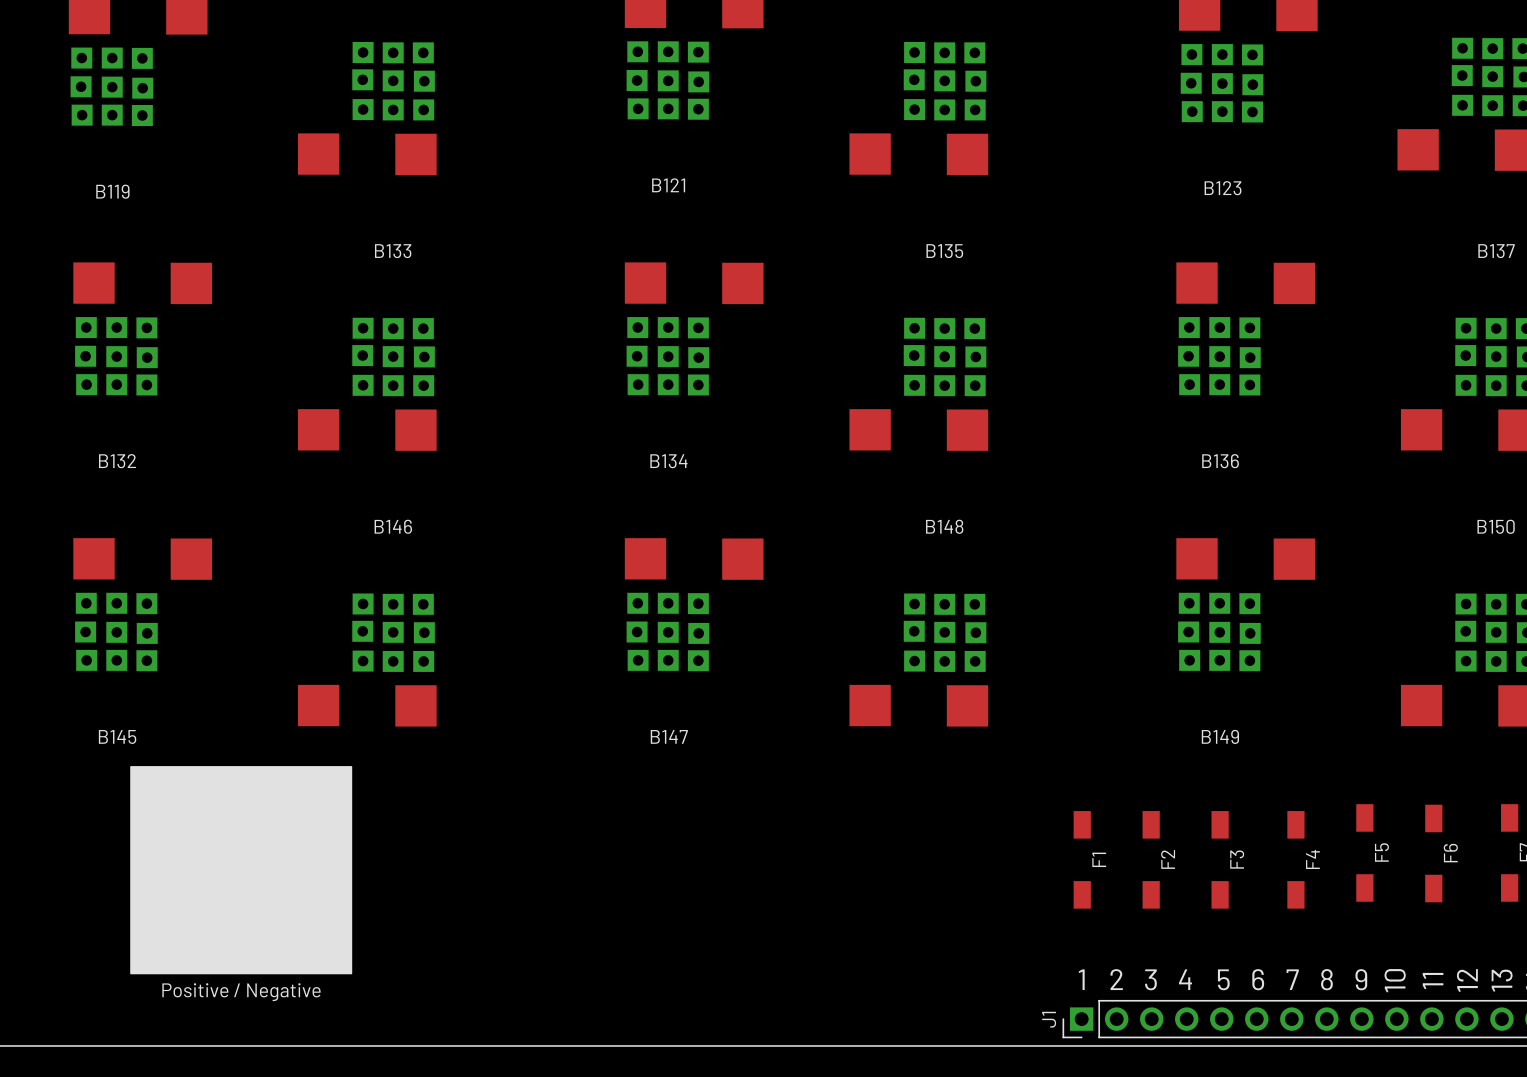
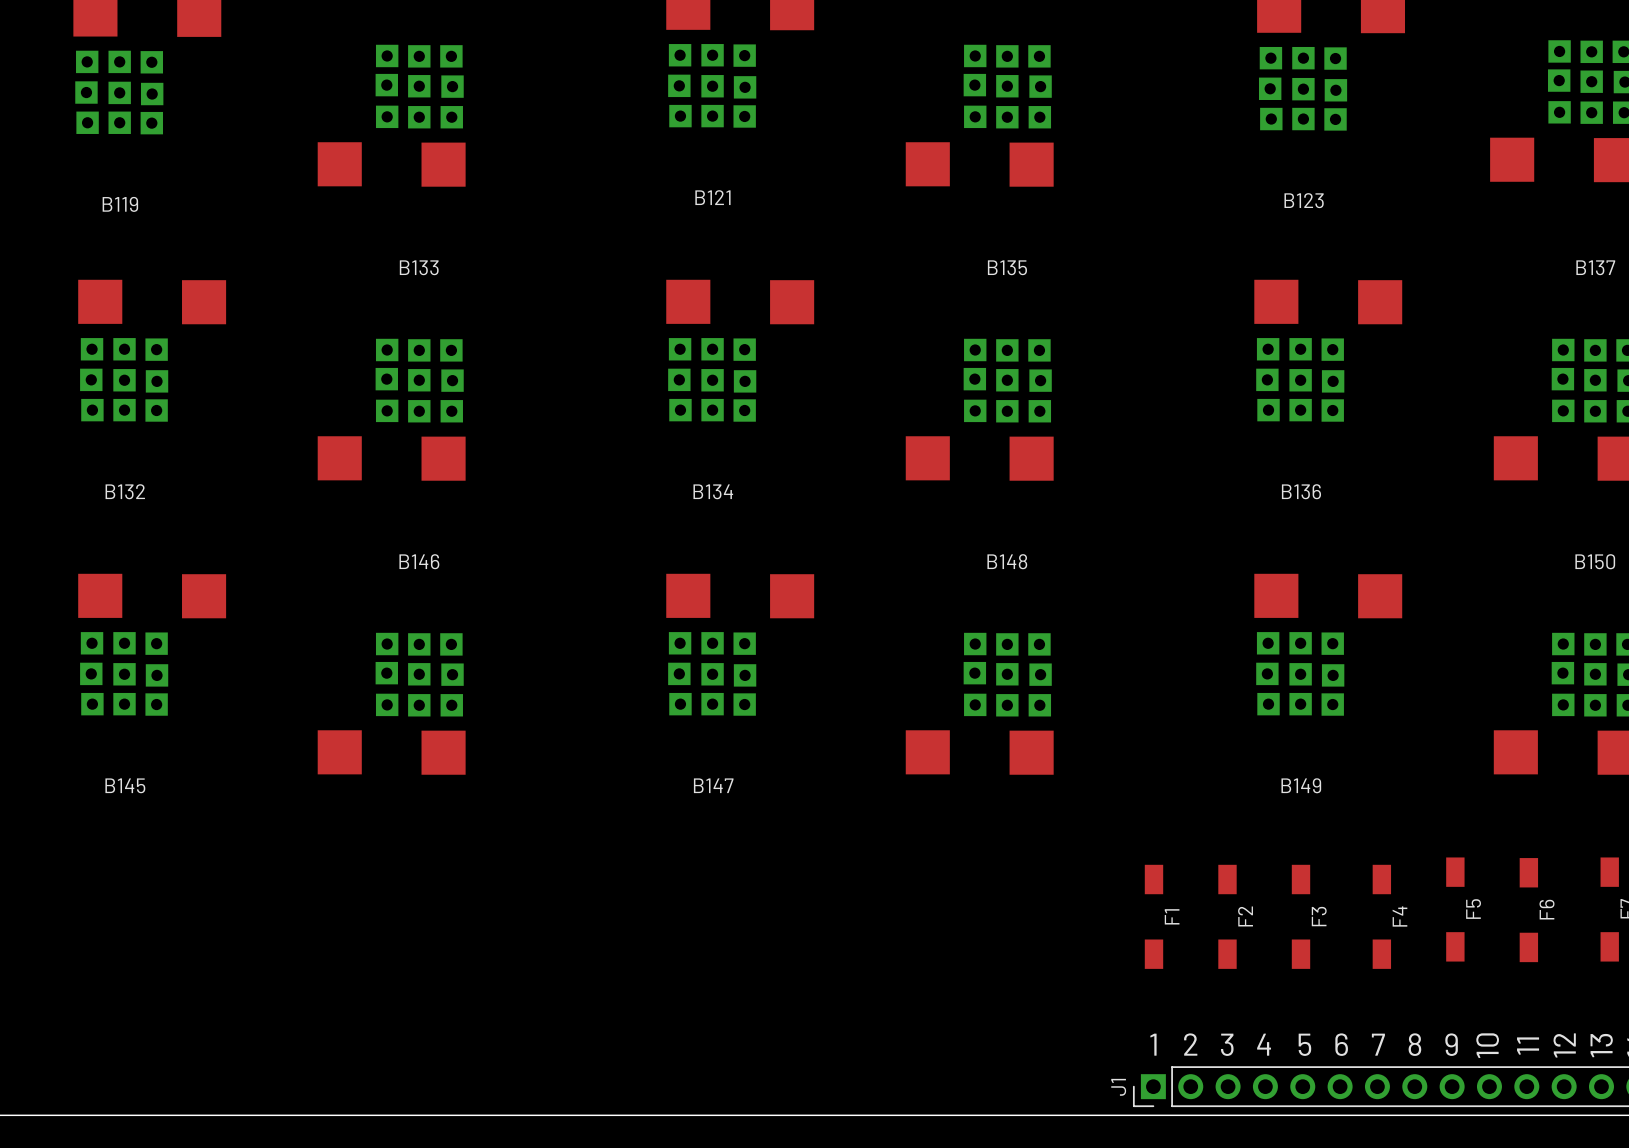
drawing: [130, 766, 353, 975] -> none
text: Positive / Negative (241, 992) -> none

